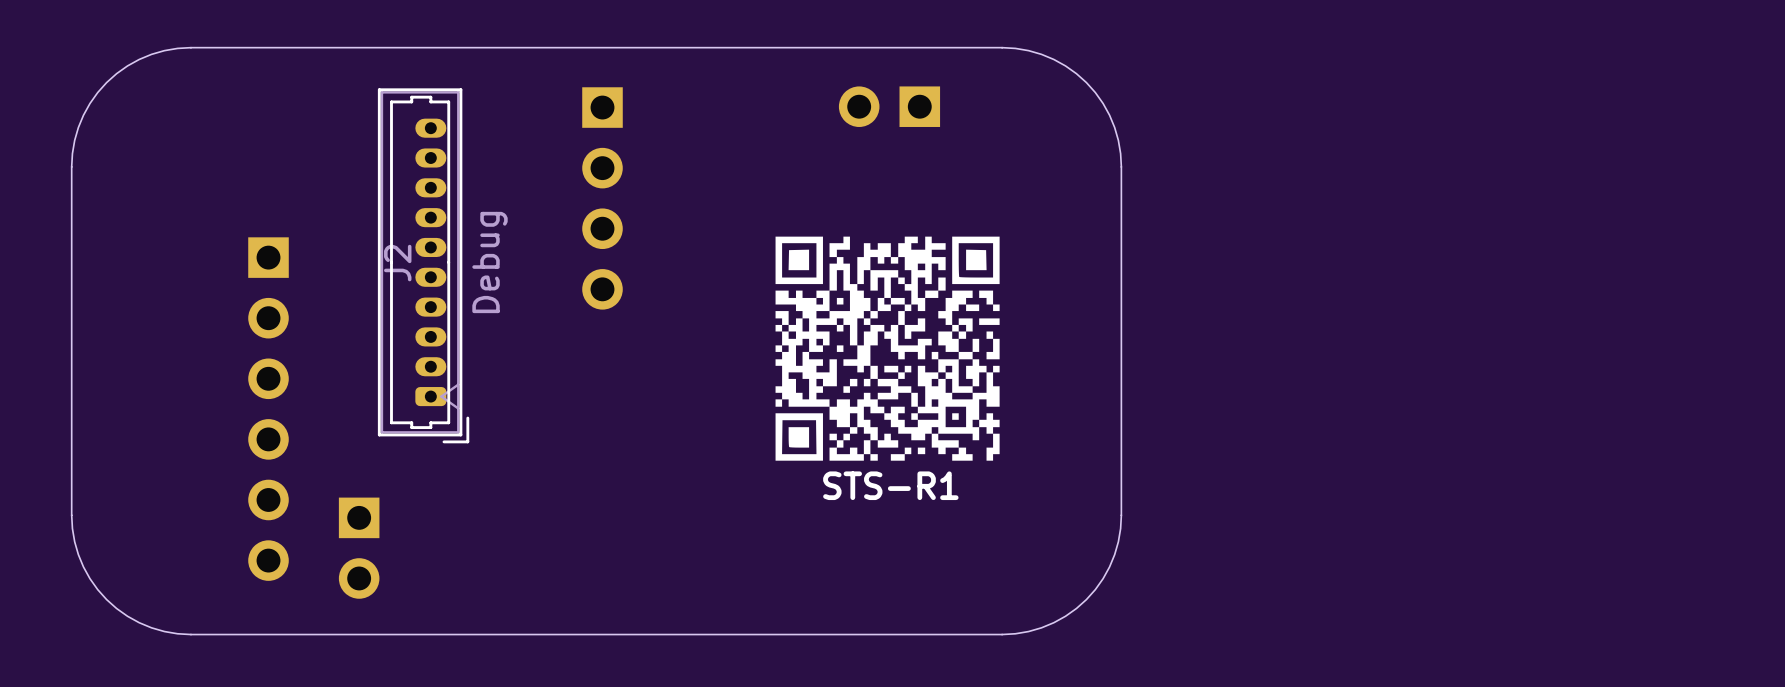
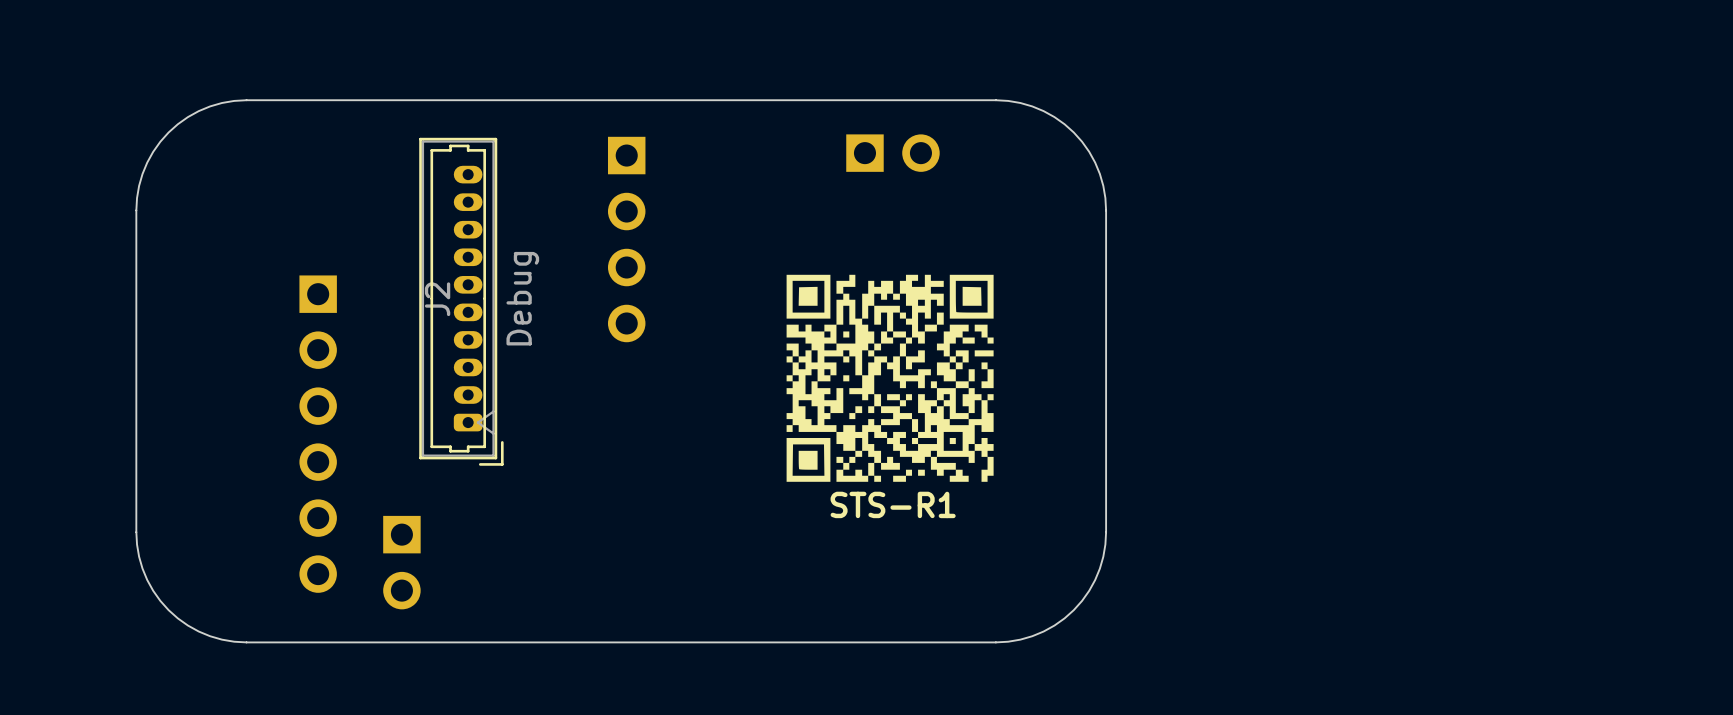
part rotation: 0° (889, 106) -> 180° (892, 153)

